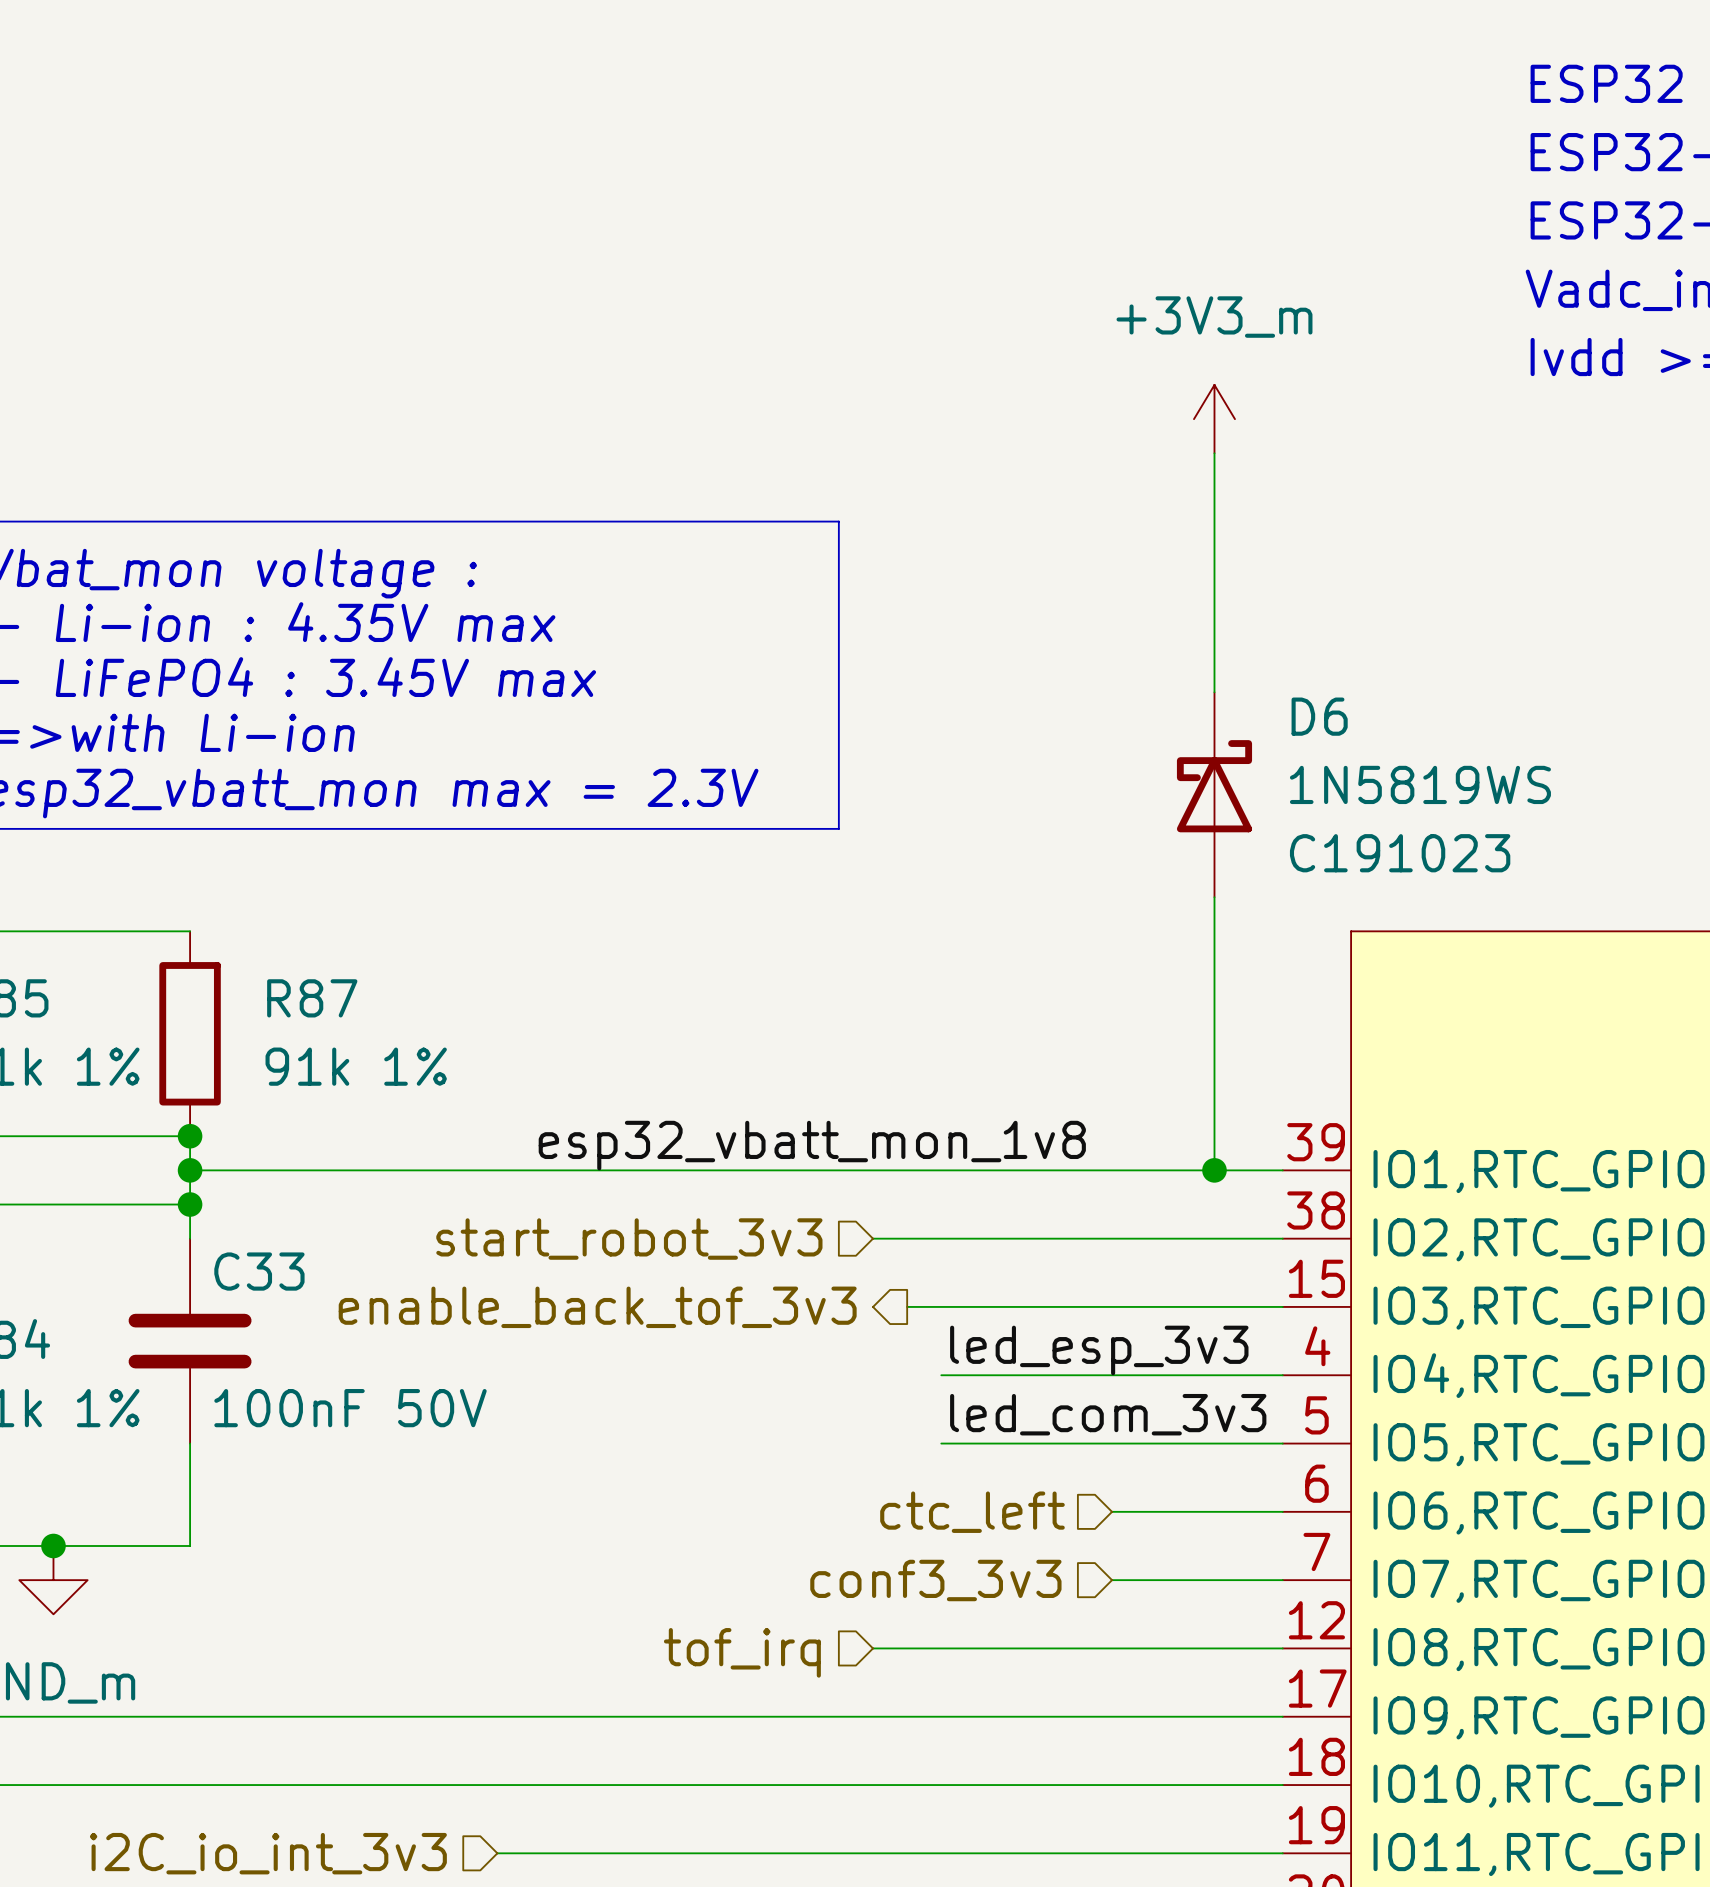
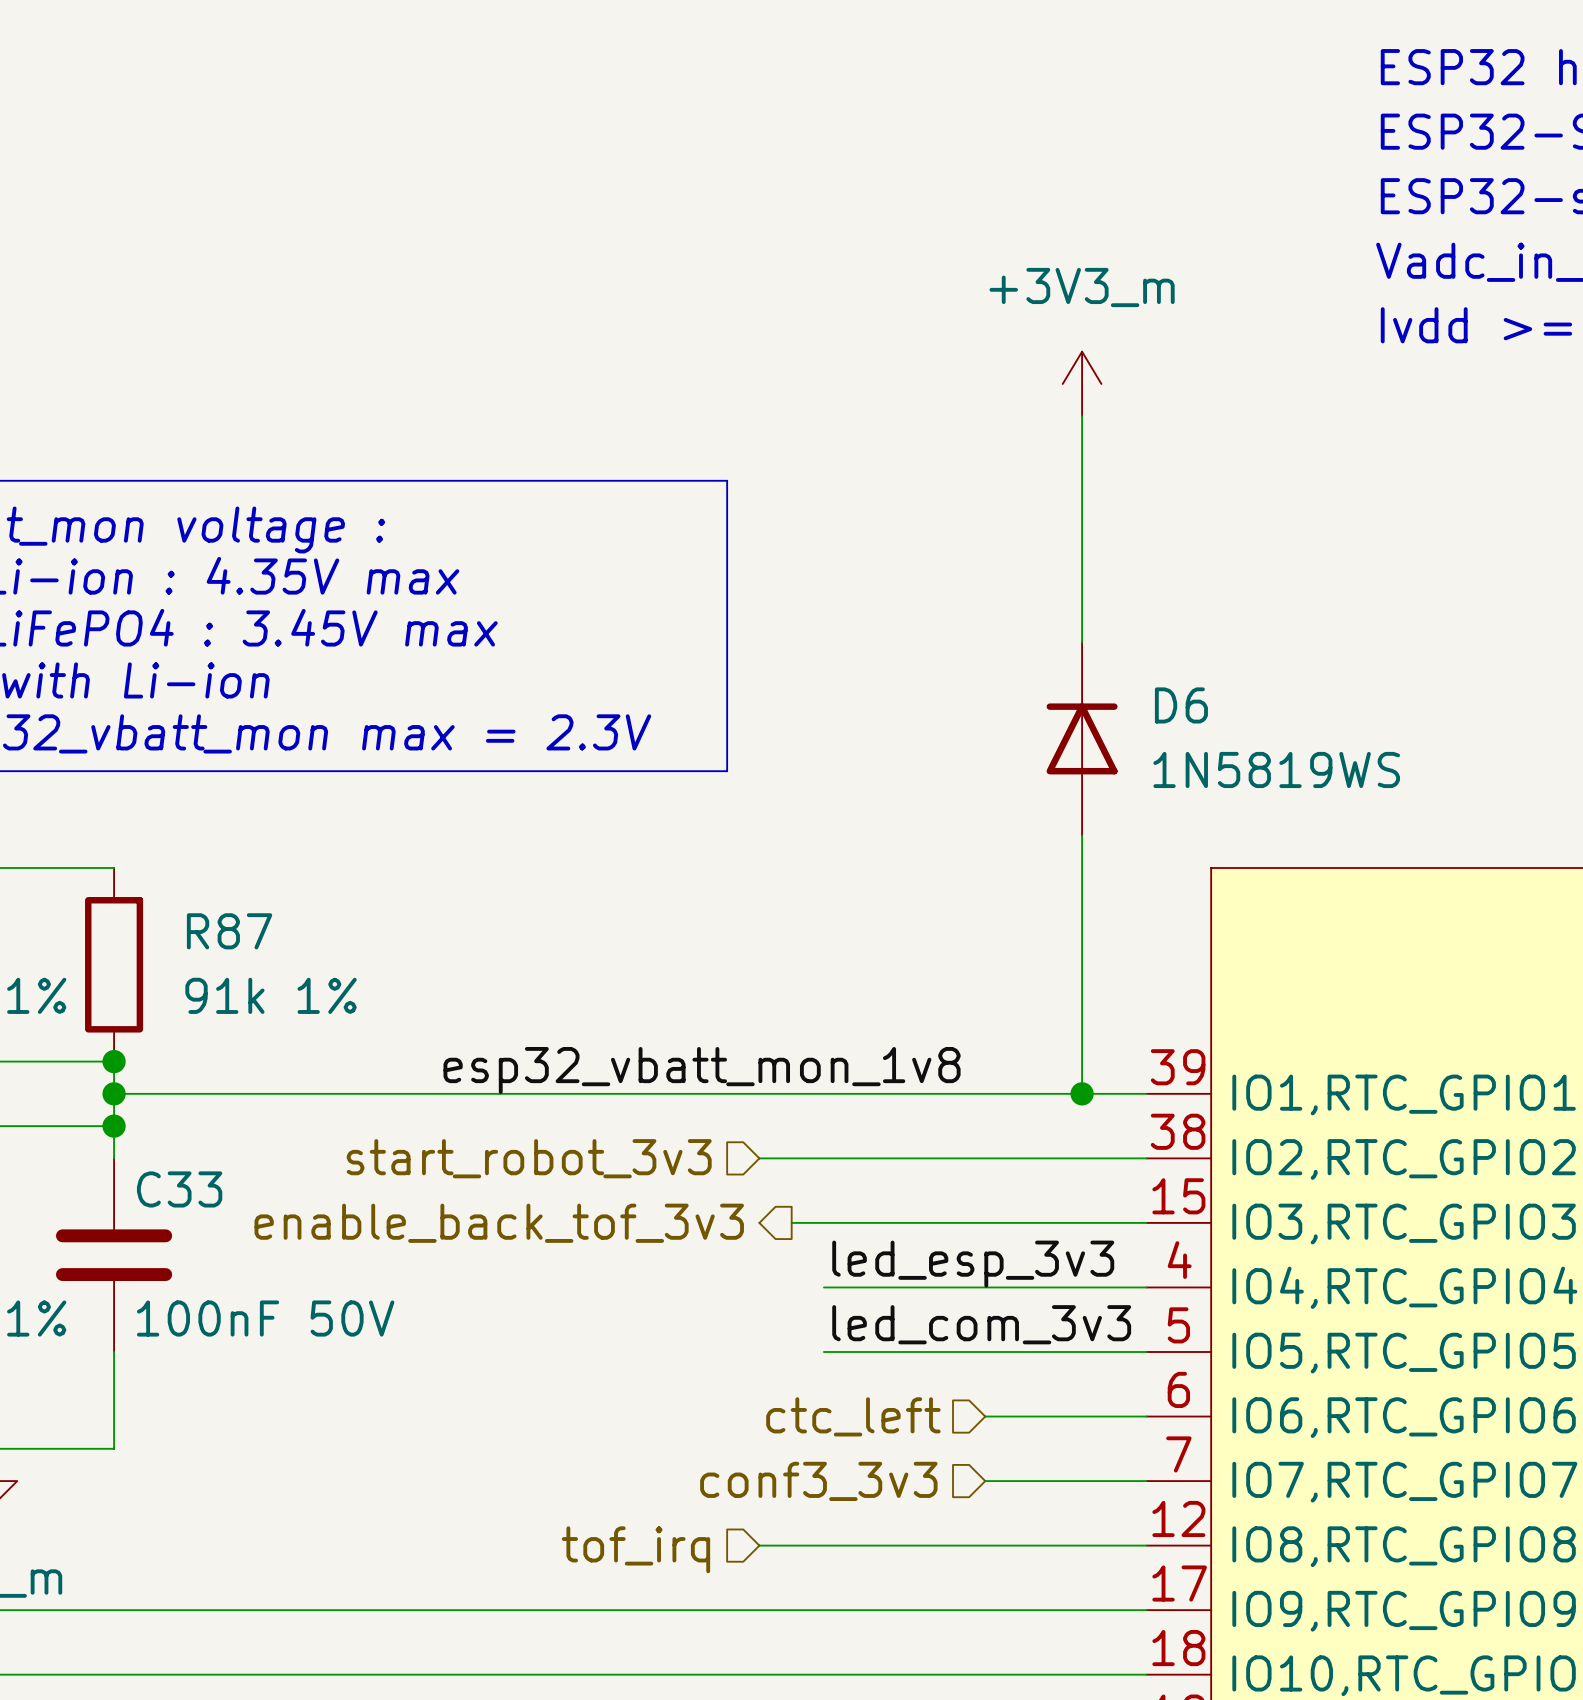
D6 symbol: [1176, 692, 1253, 898] -> [1046, 642, 1118, 836]
D6 name position: D6 (1319, 716) -> D6 (1181, 705)
D6 value position: 1N5819WS (1420, 784) -> 1N5819WS (1276, 769)
D6 text: C191023 (1400, 853) -> none

